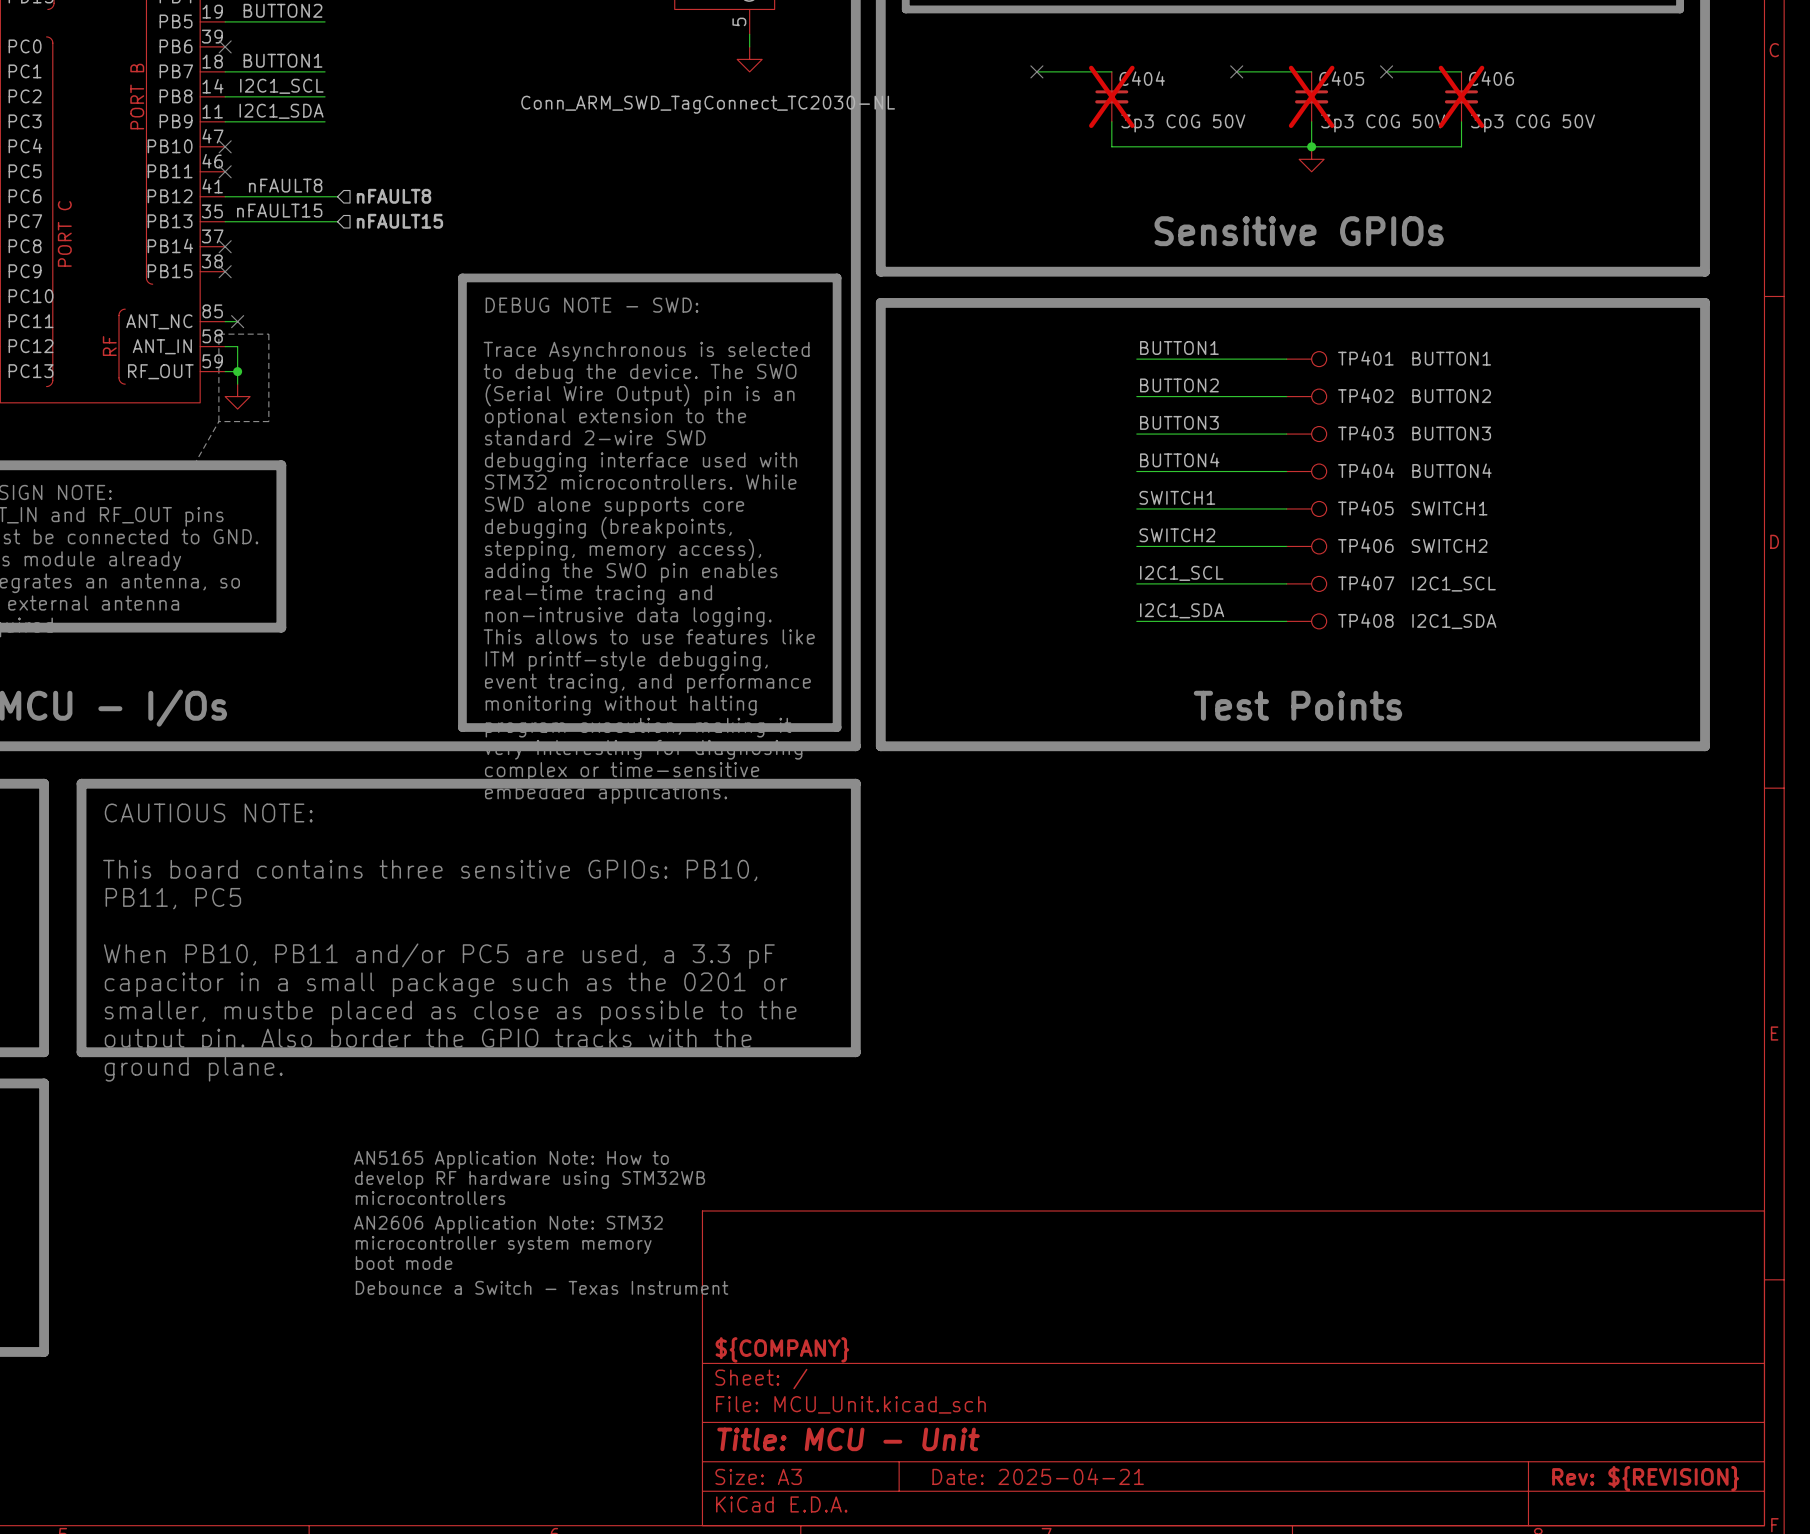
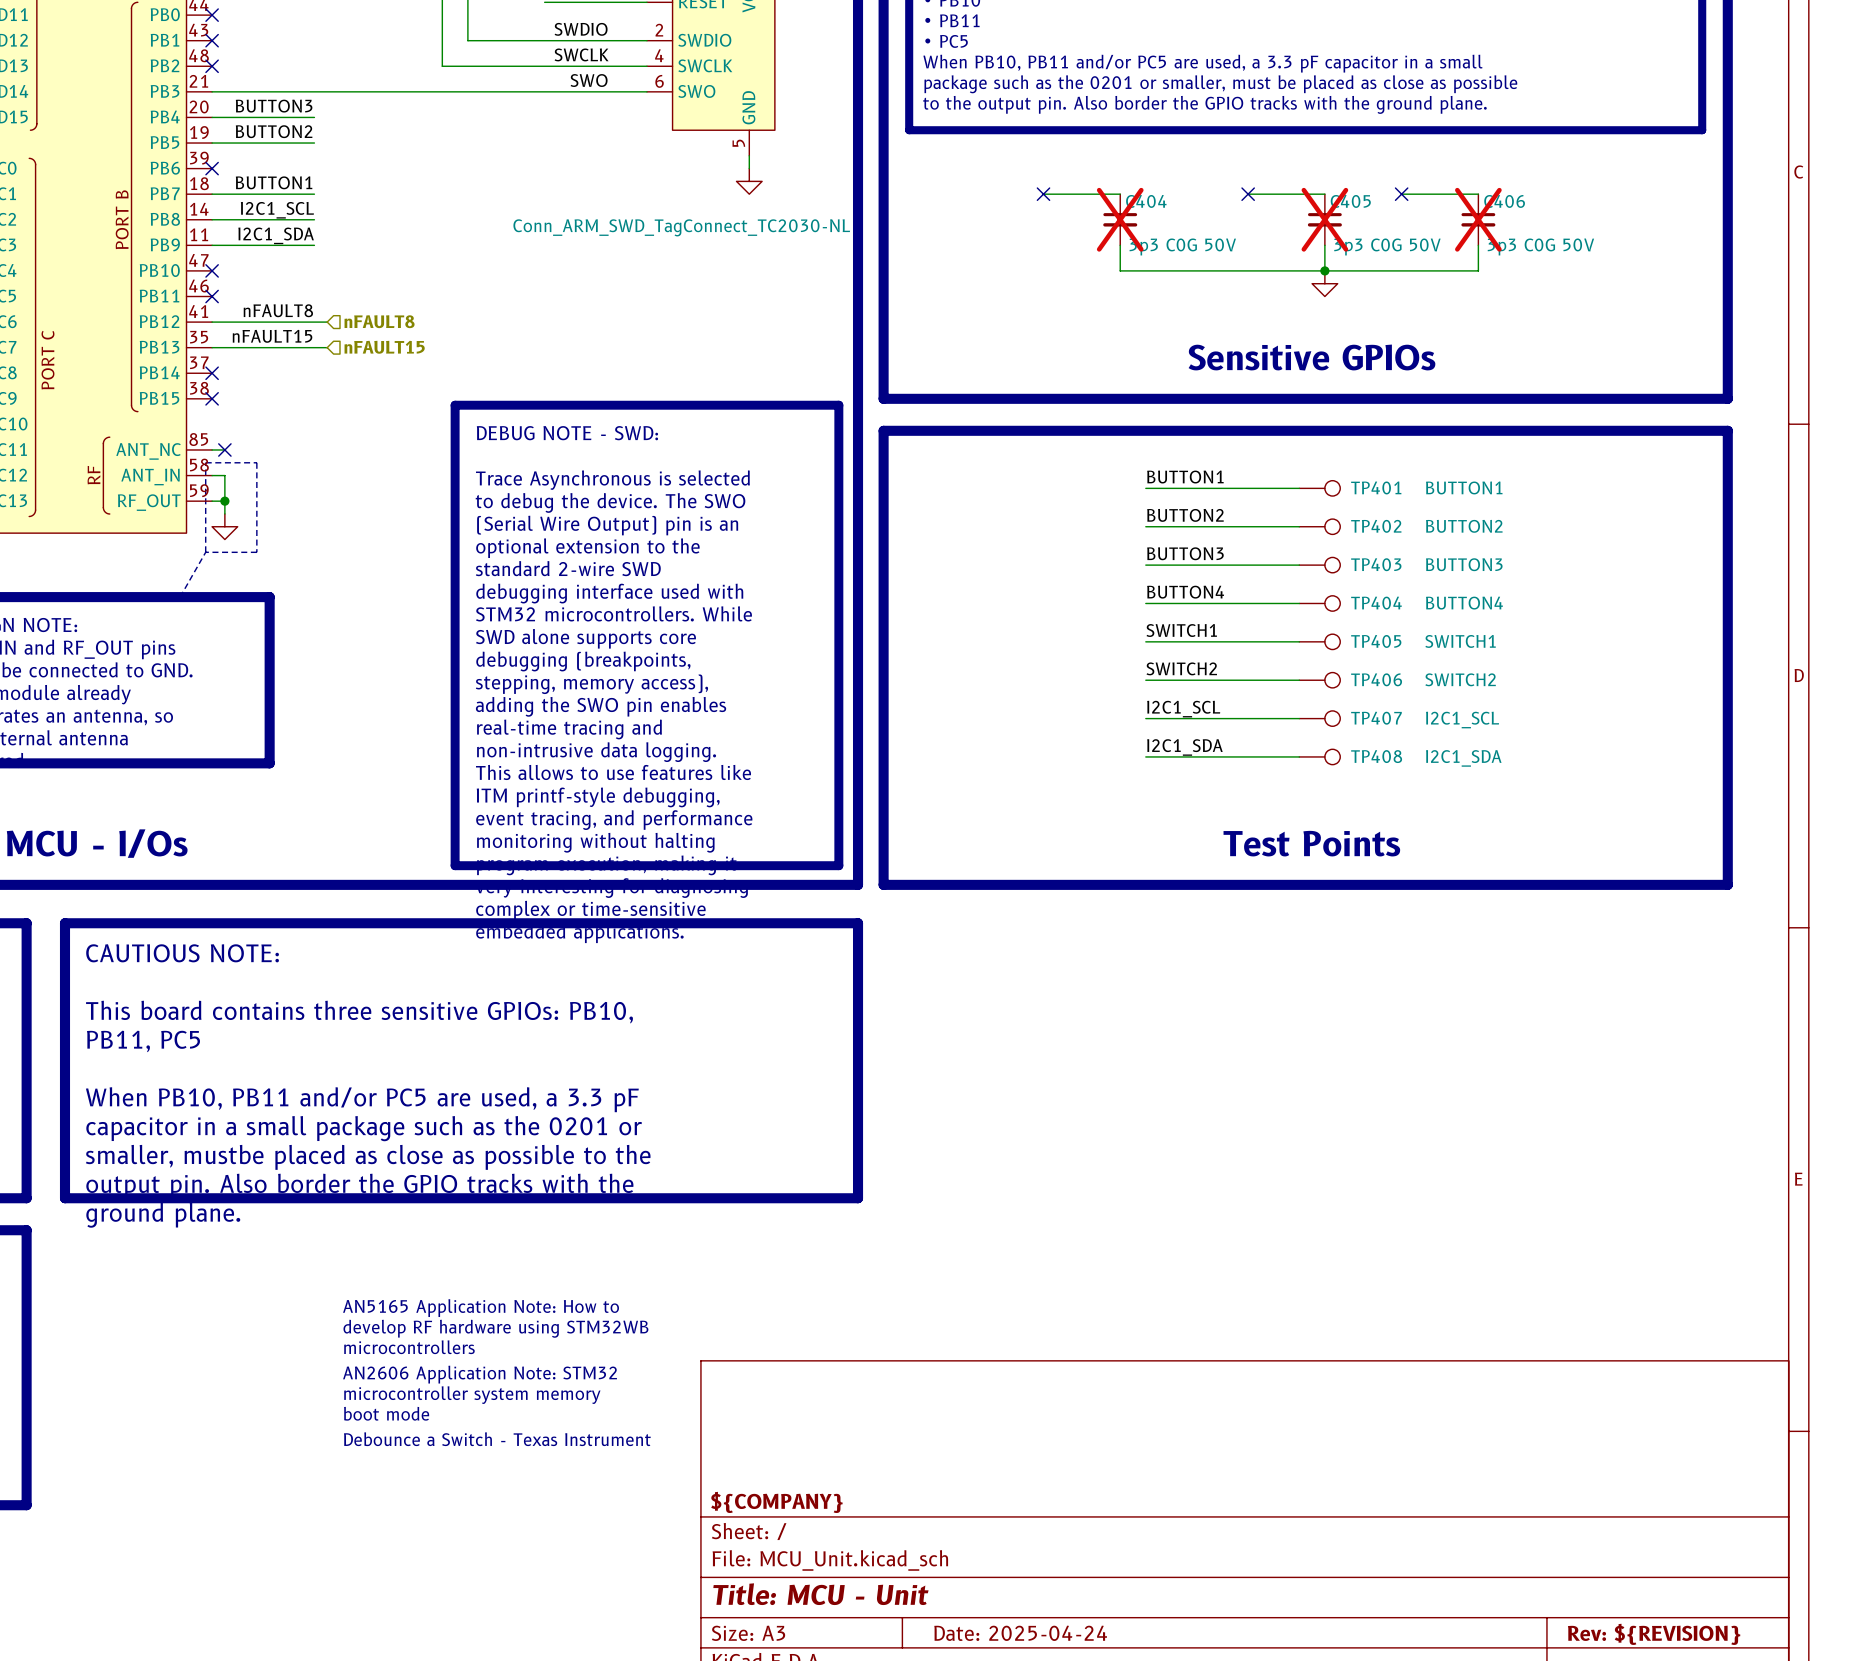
title block: Date: 2025-04-21 (1038, 1476) -> Date: 2025-04-24 (1020, 1633)

